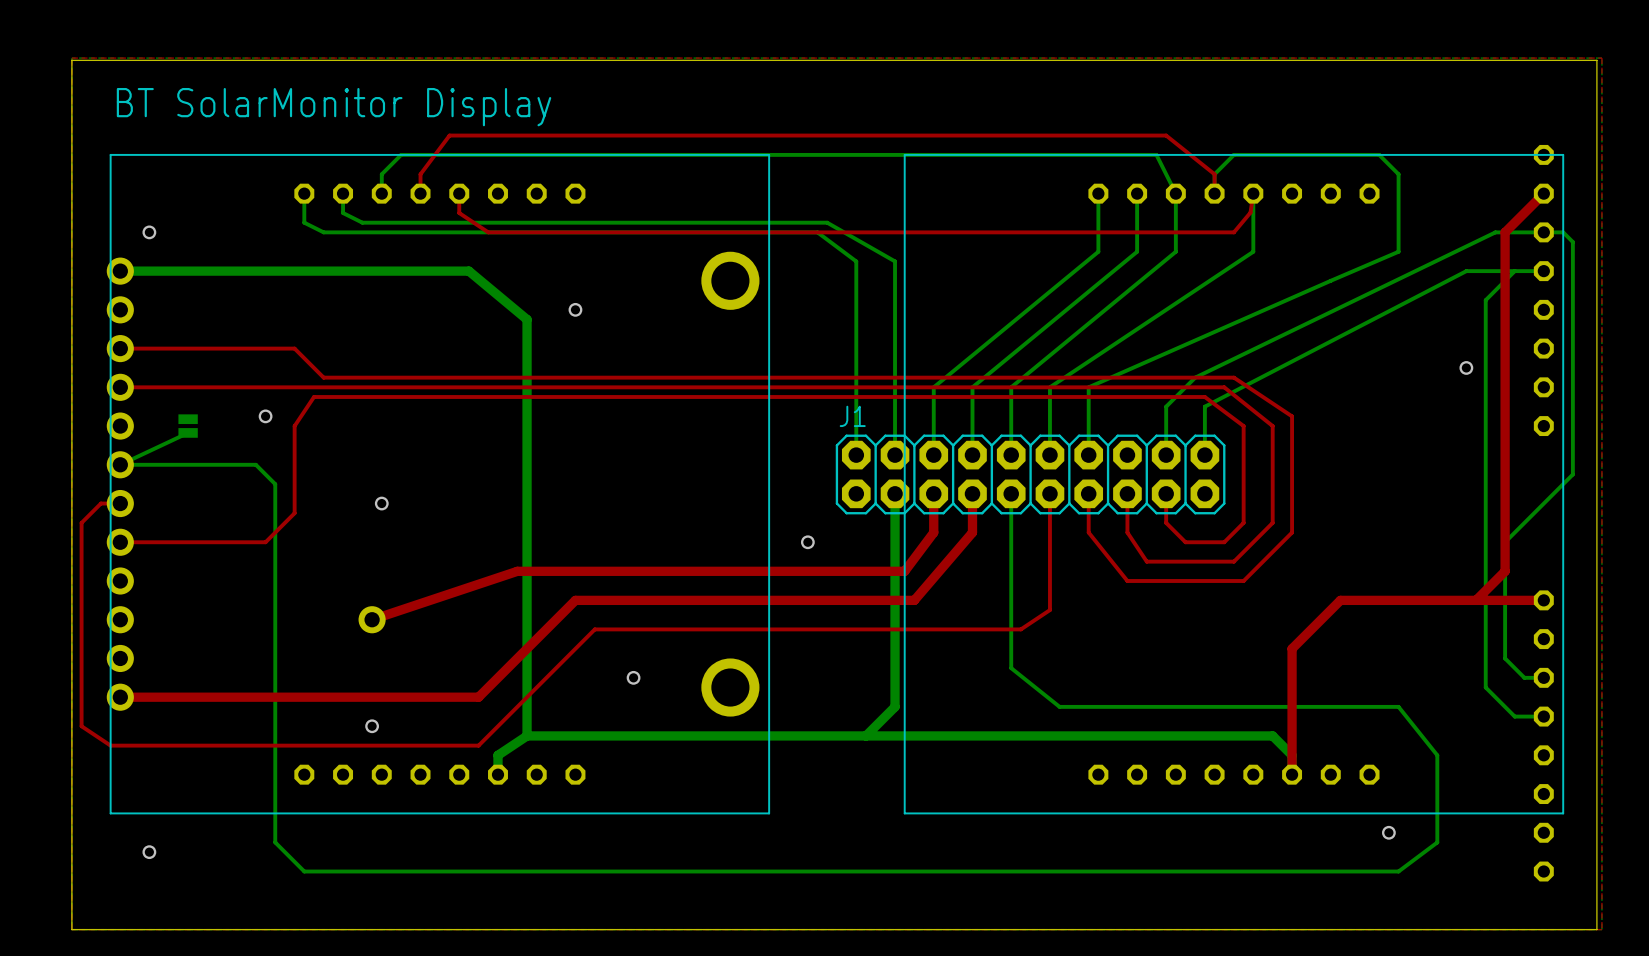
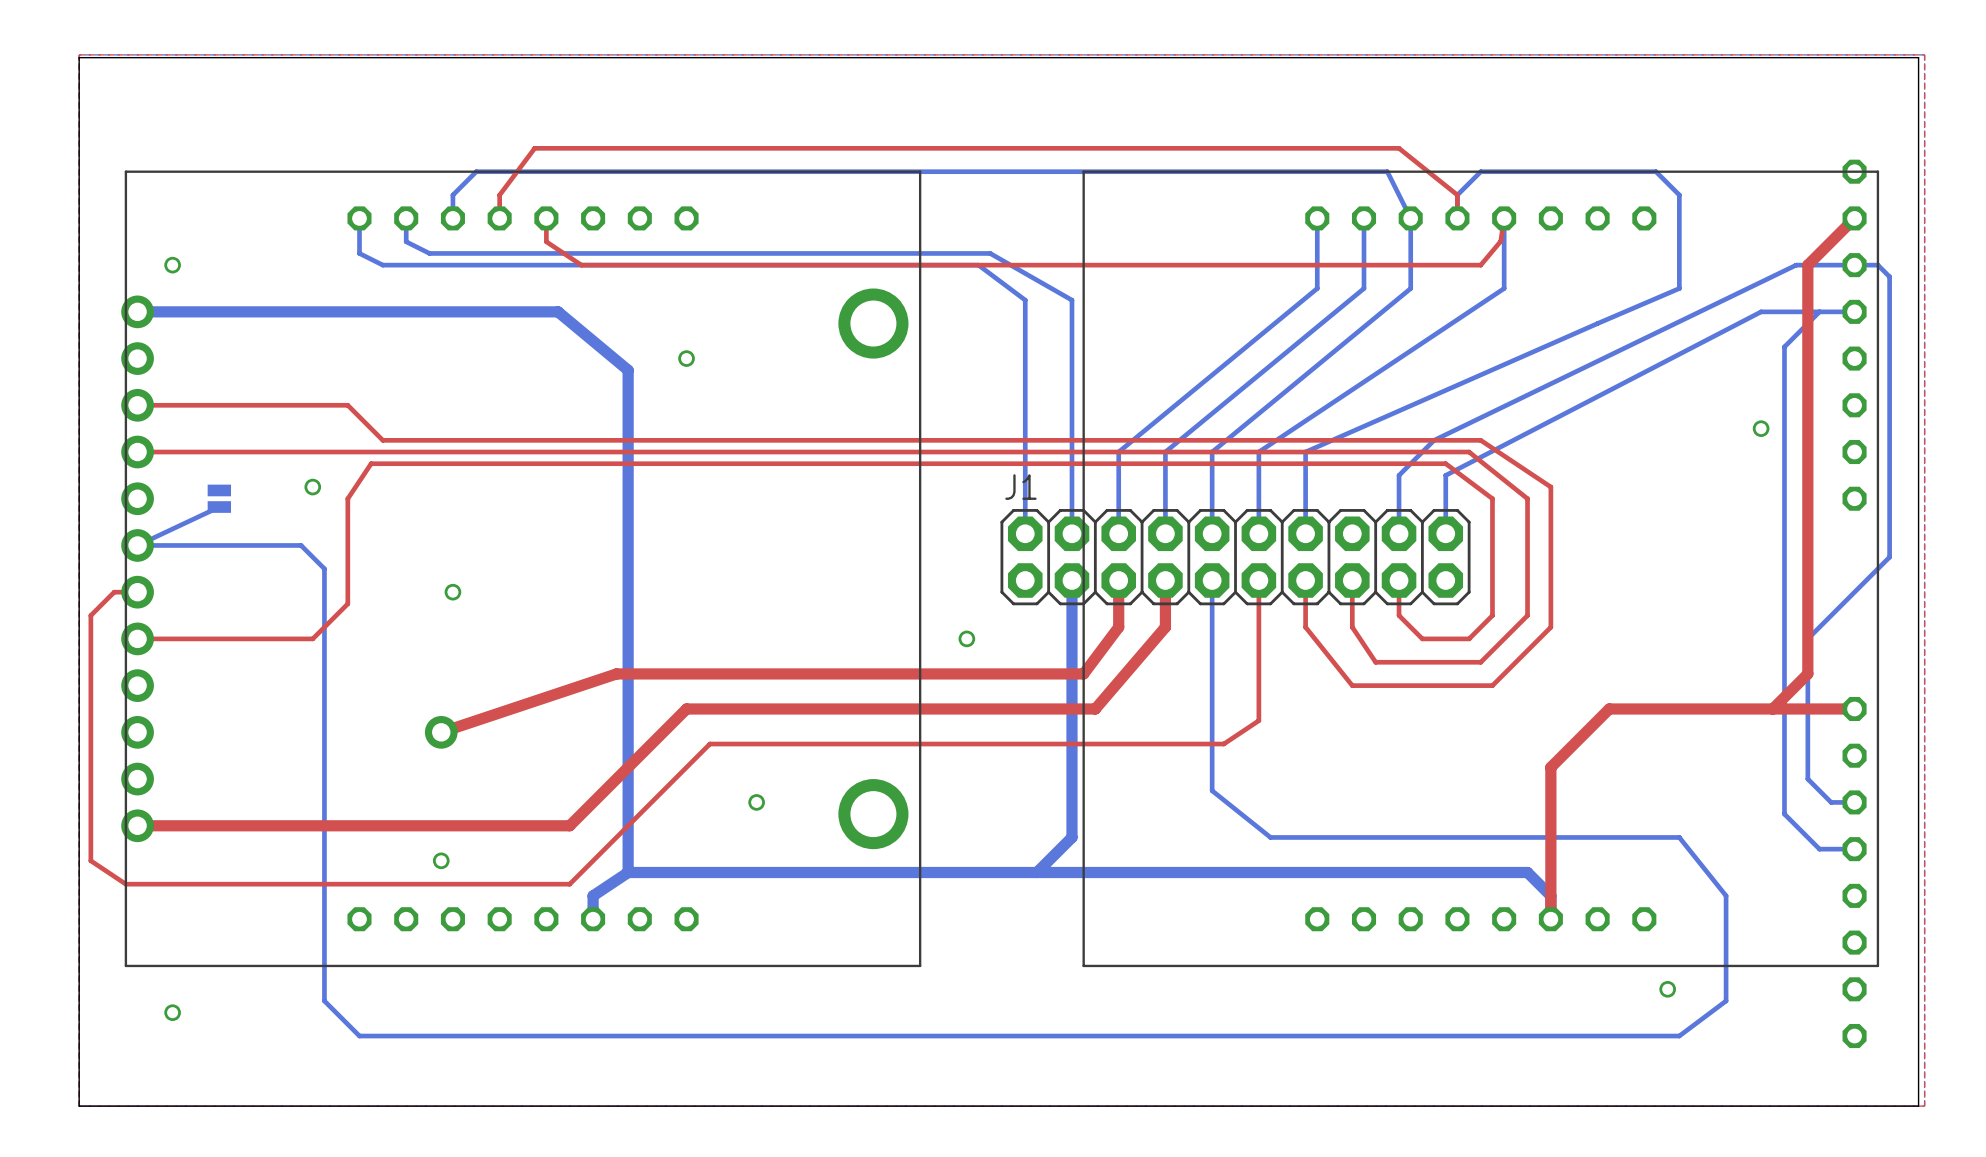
text: BT SolarMonitor Display (334, 107) -> none

